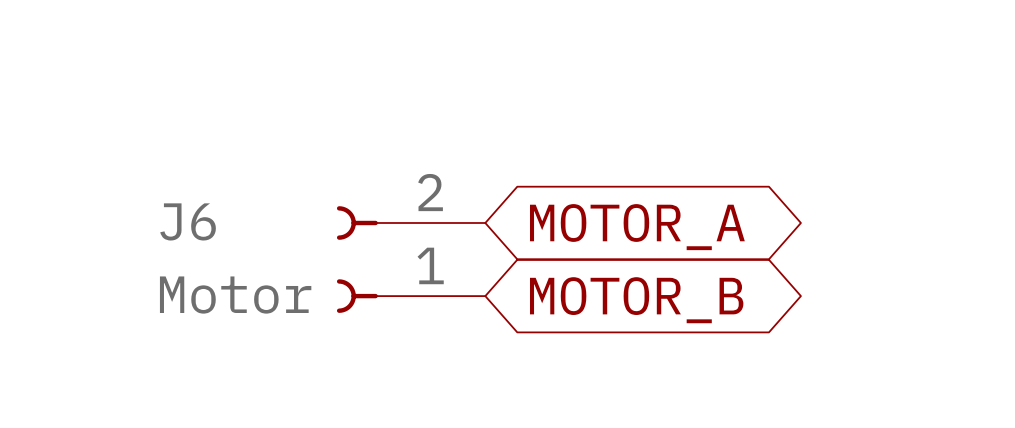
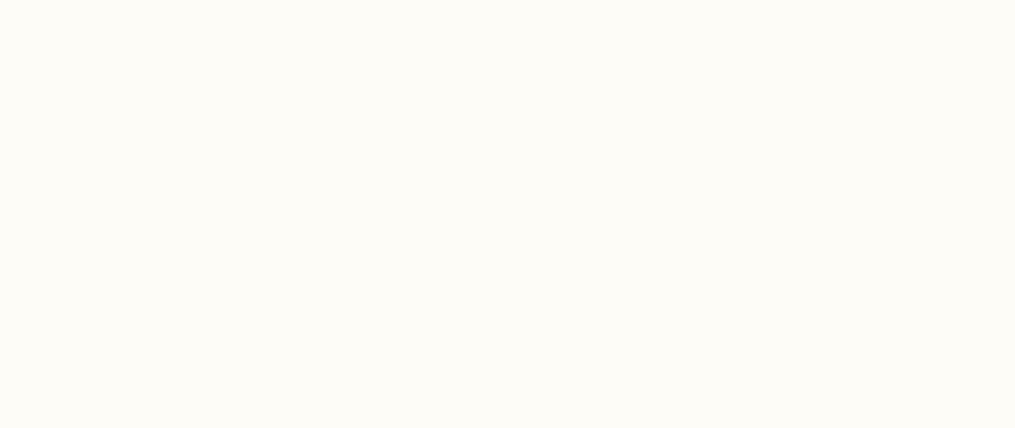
global label: MOTOR_A (637, 227) -> none
J6: Motor (411, 259) -> none
global label: MOTOR_B (636, 300) -> none

